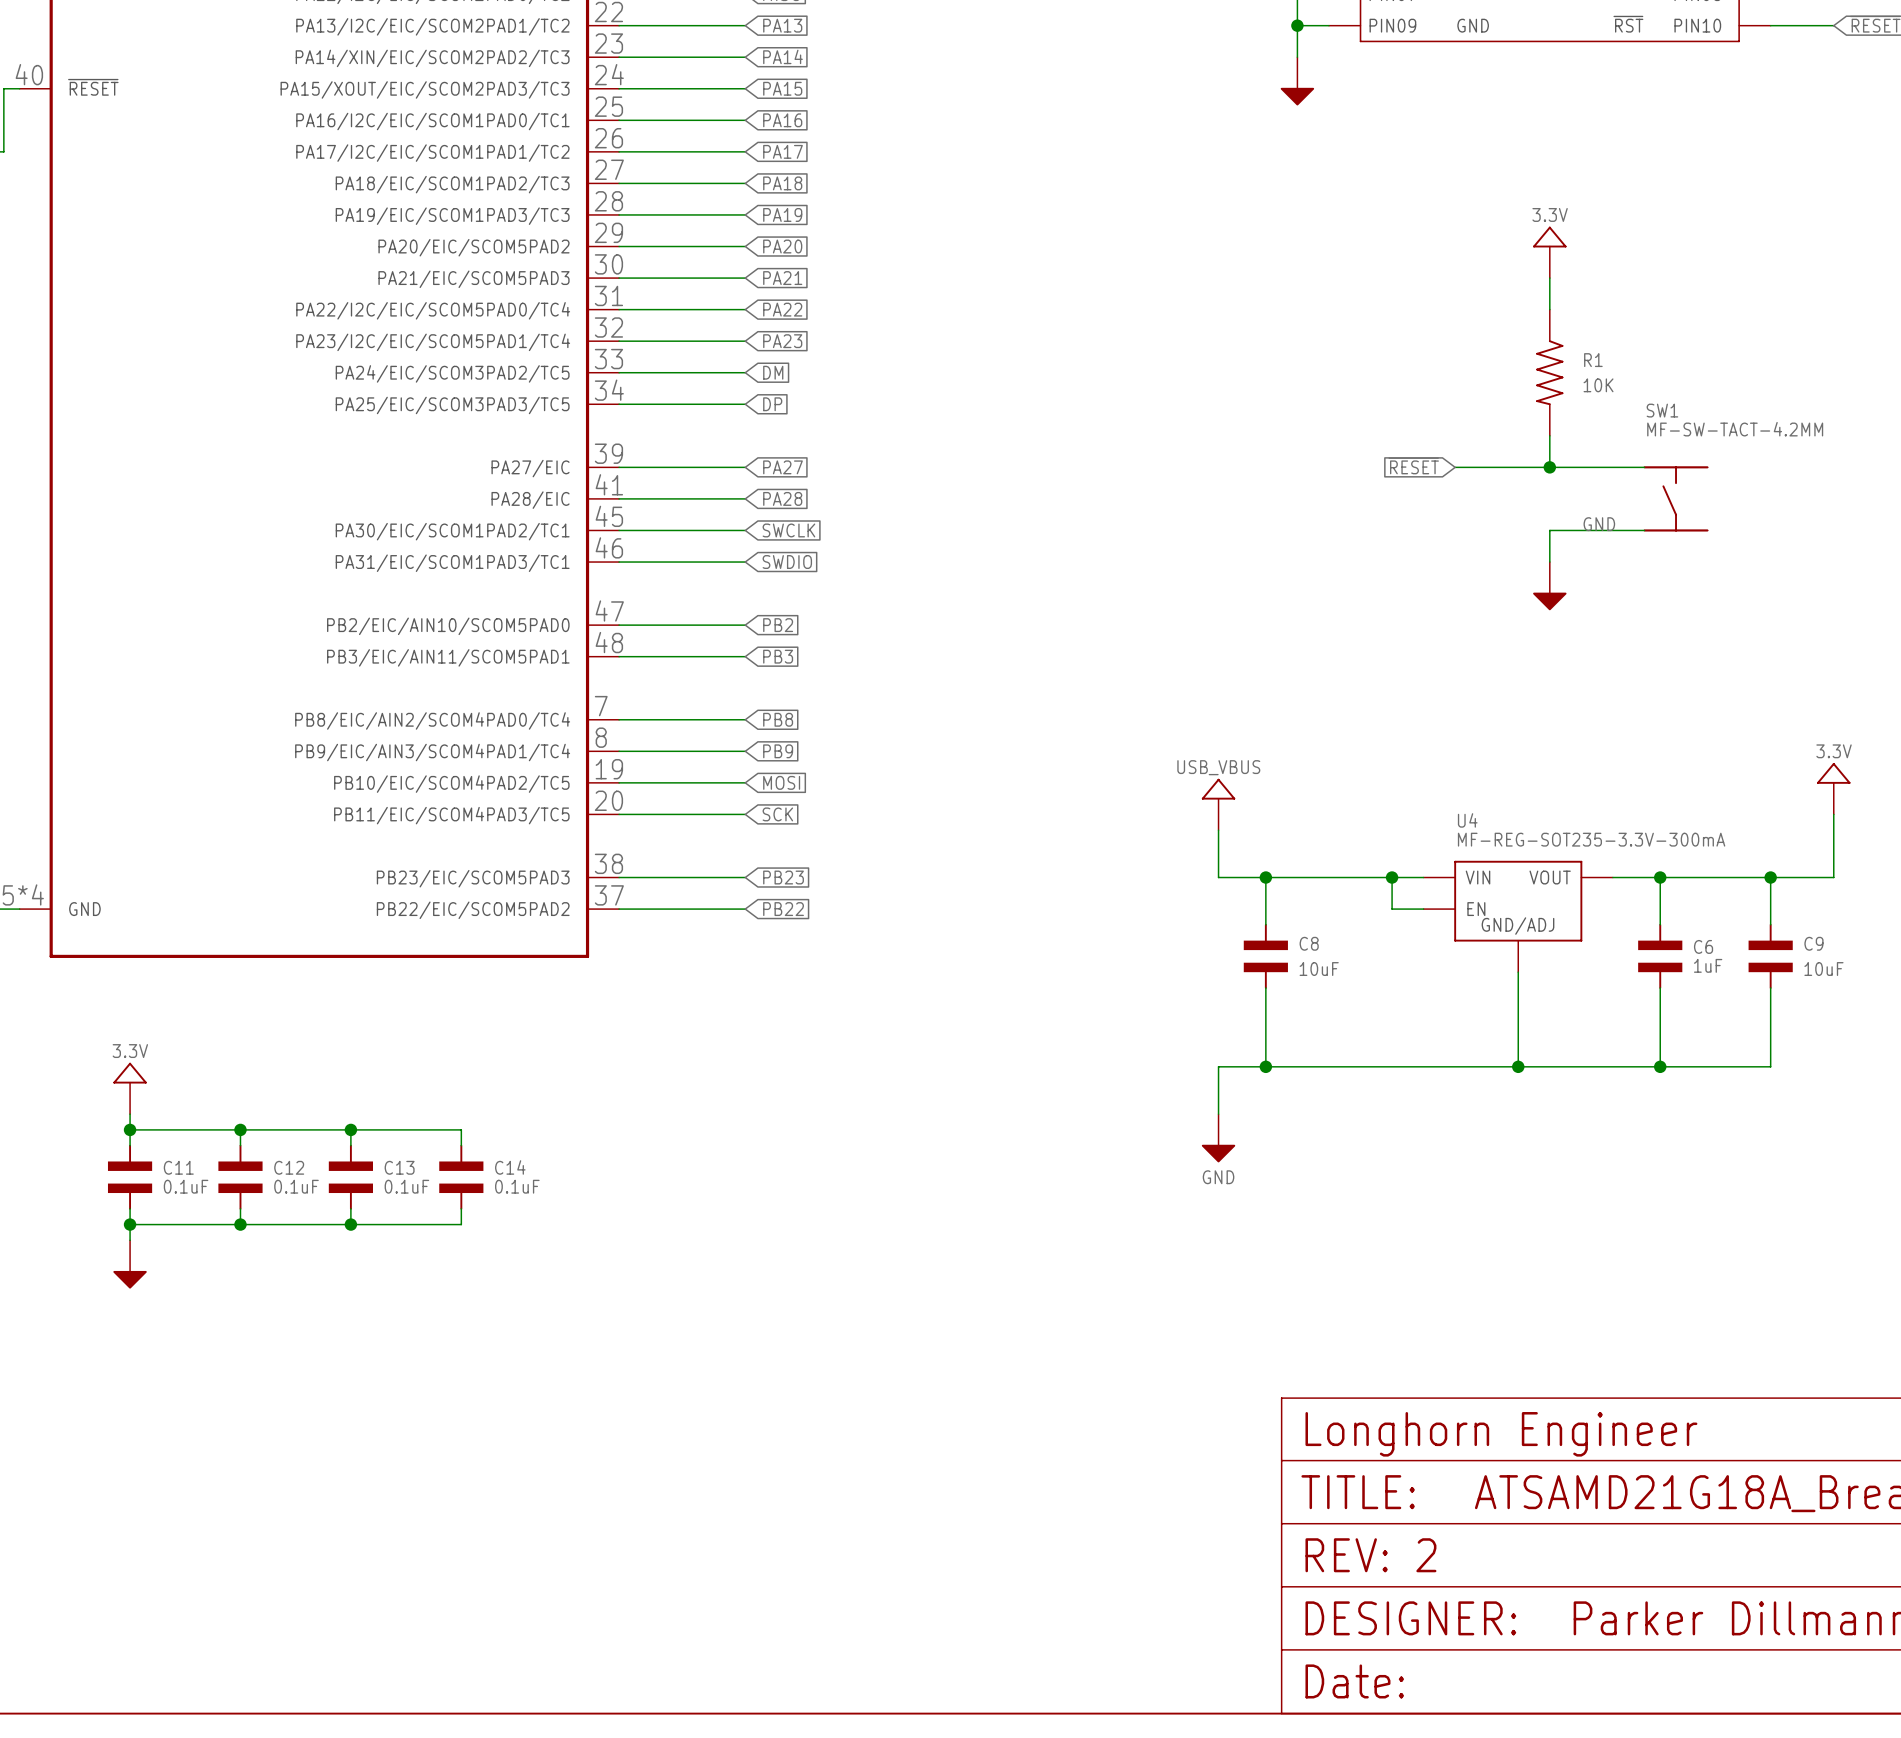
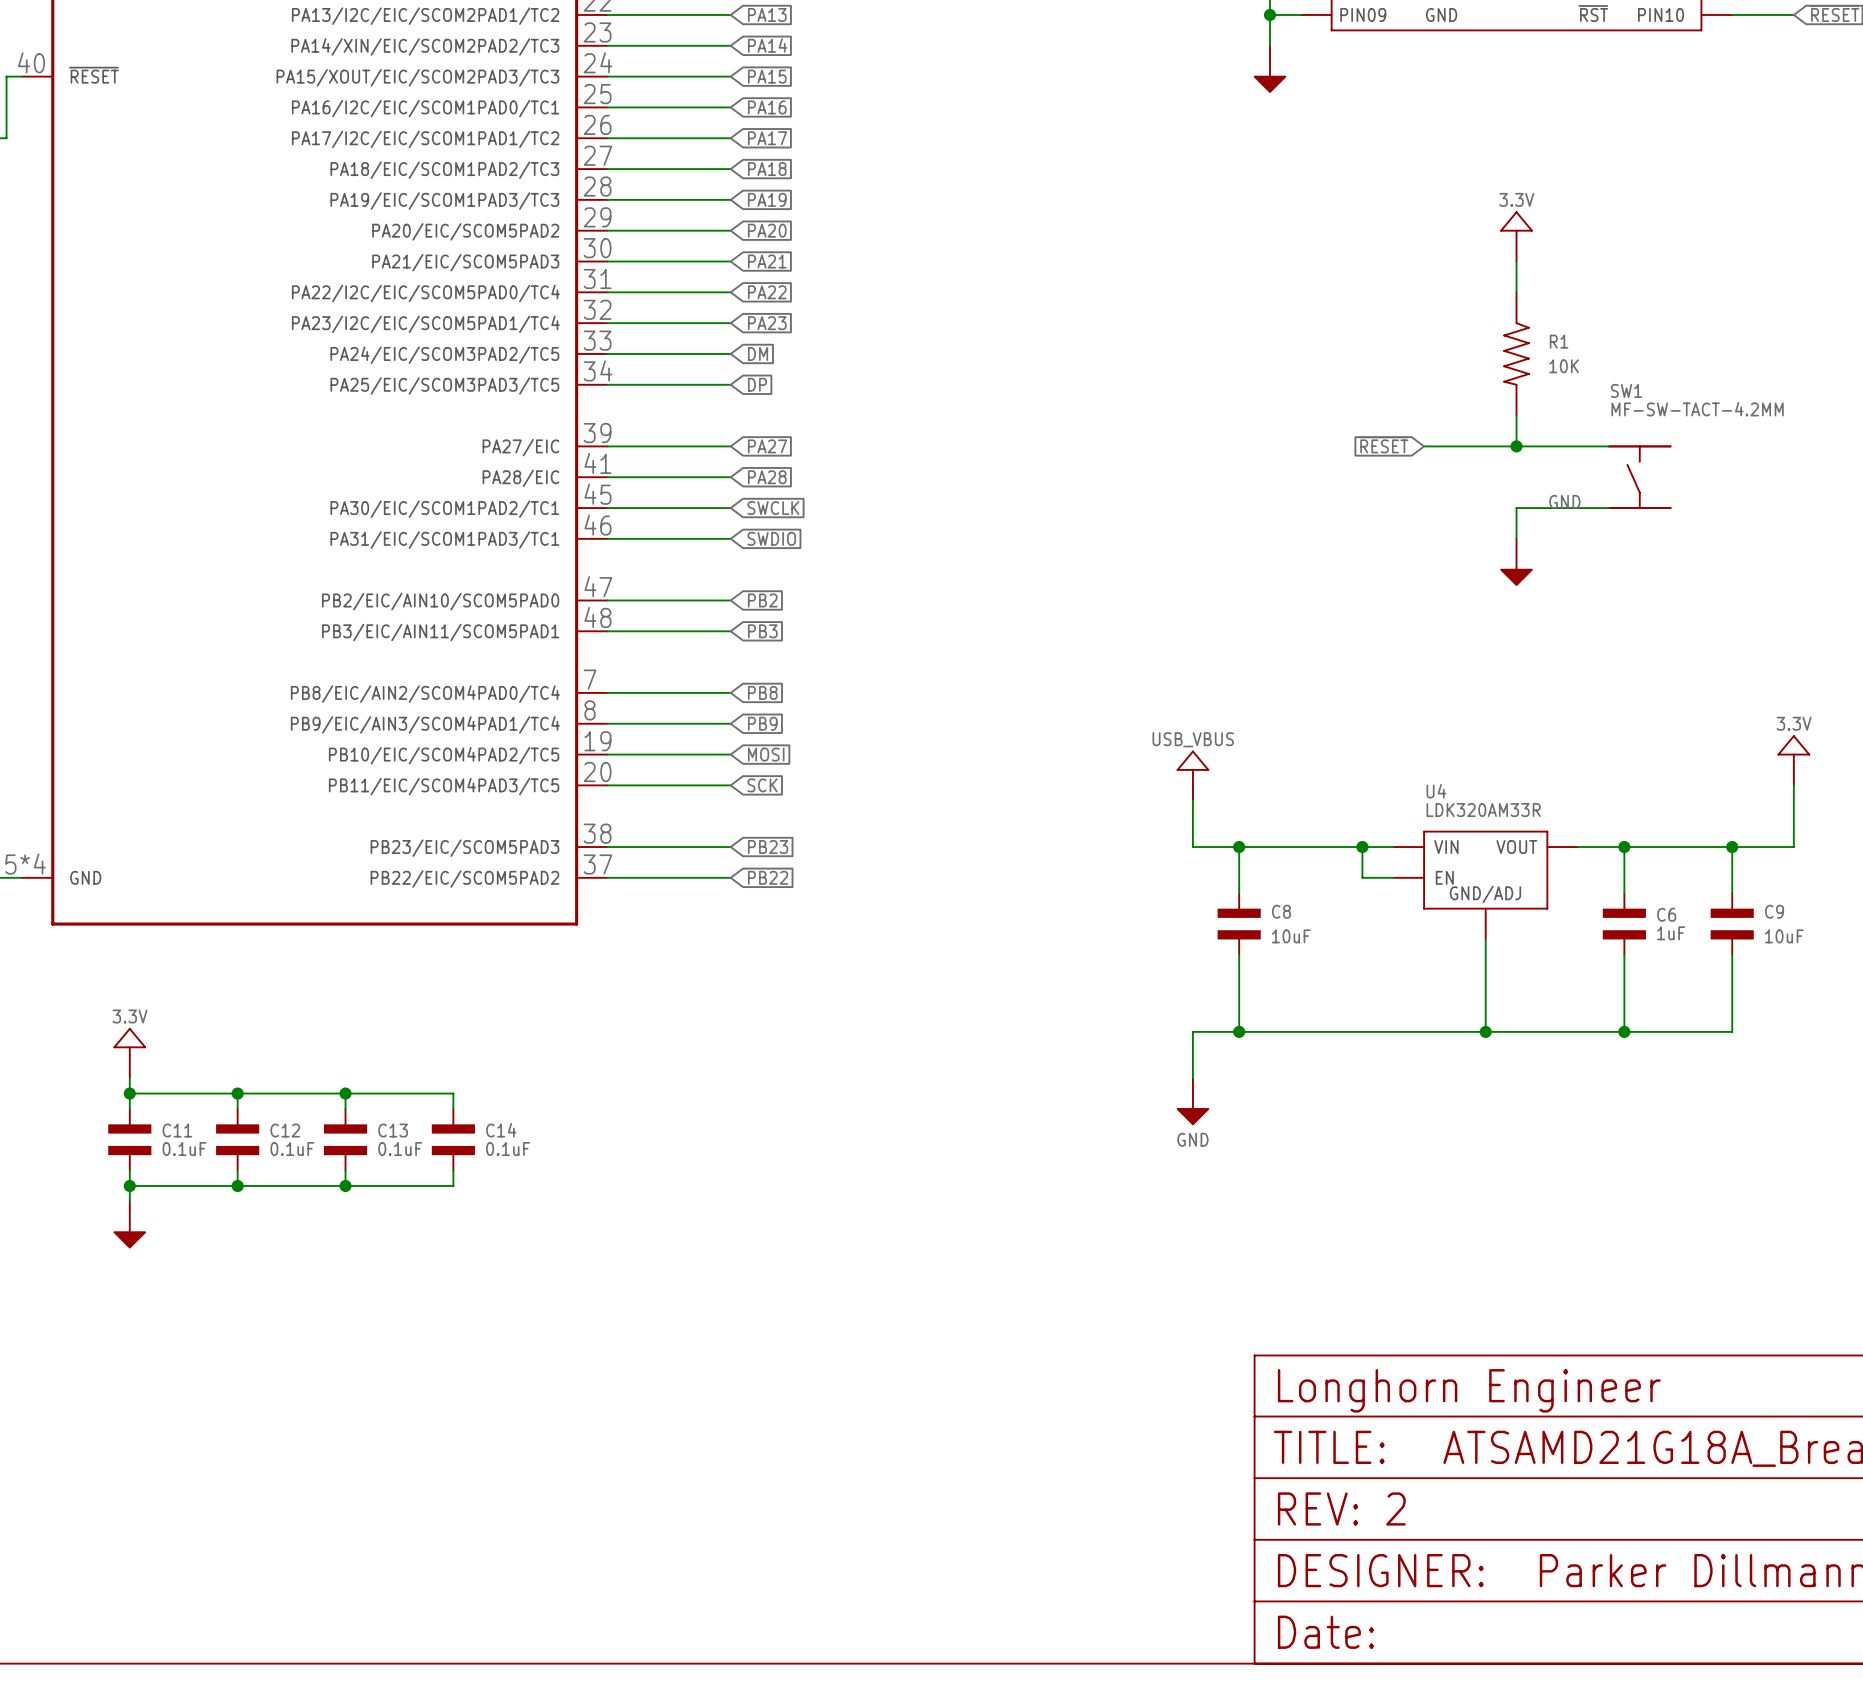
U4 value: MF-REG-SOT235-3.3V-300mA (1591, 839) -> LDK320AM33R (1483, 810)

